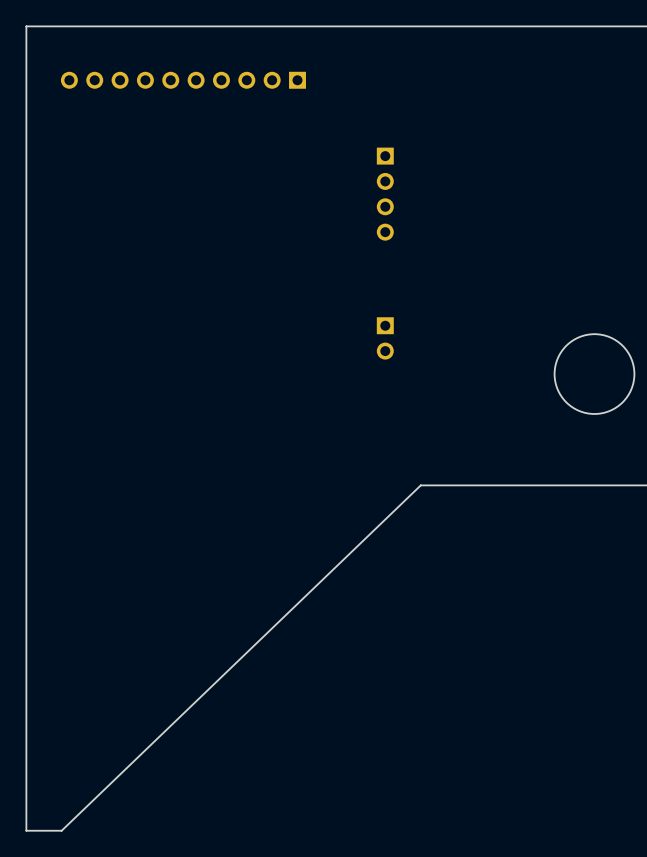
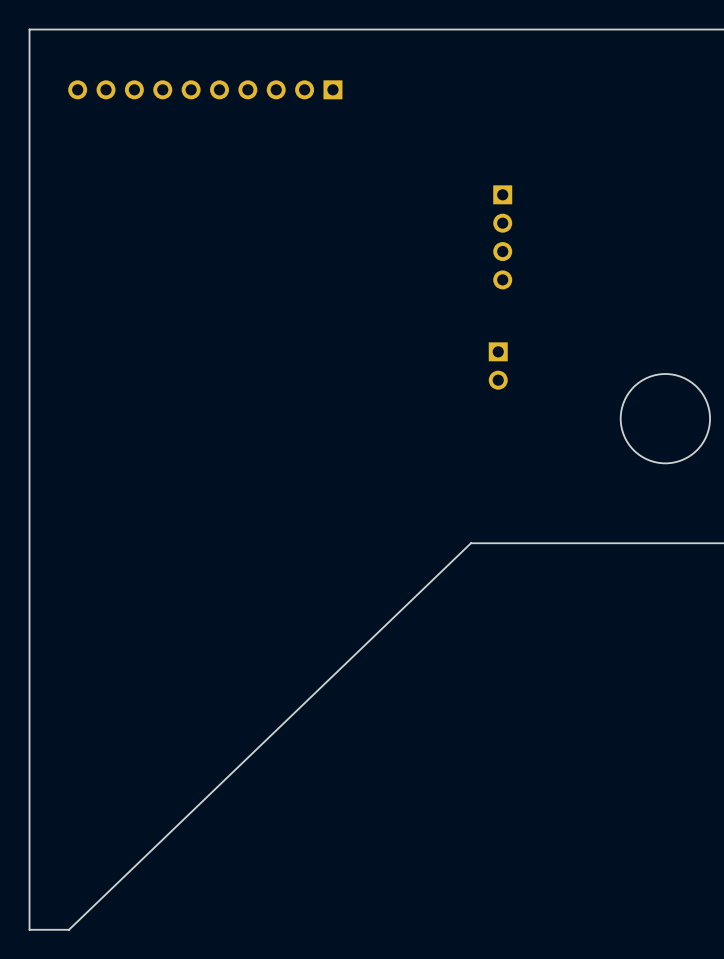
part position: (385, 194) -> (502, 237)
part position: (385, 338) -> (498, 366)

